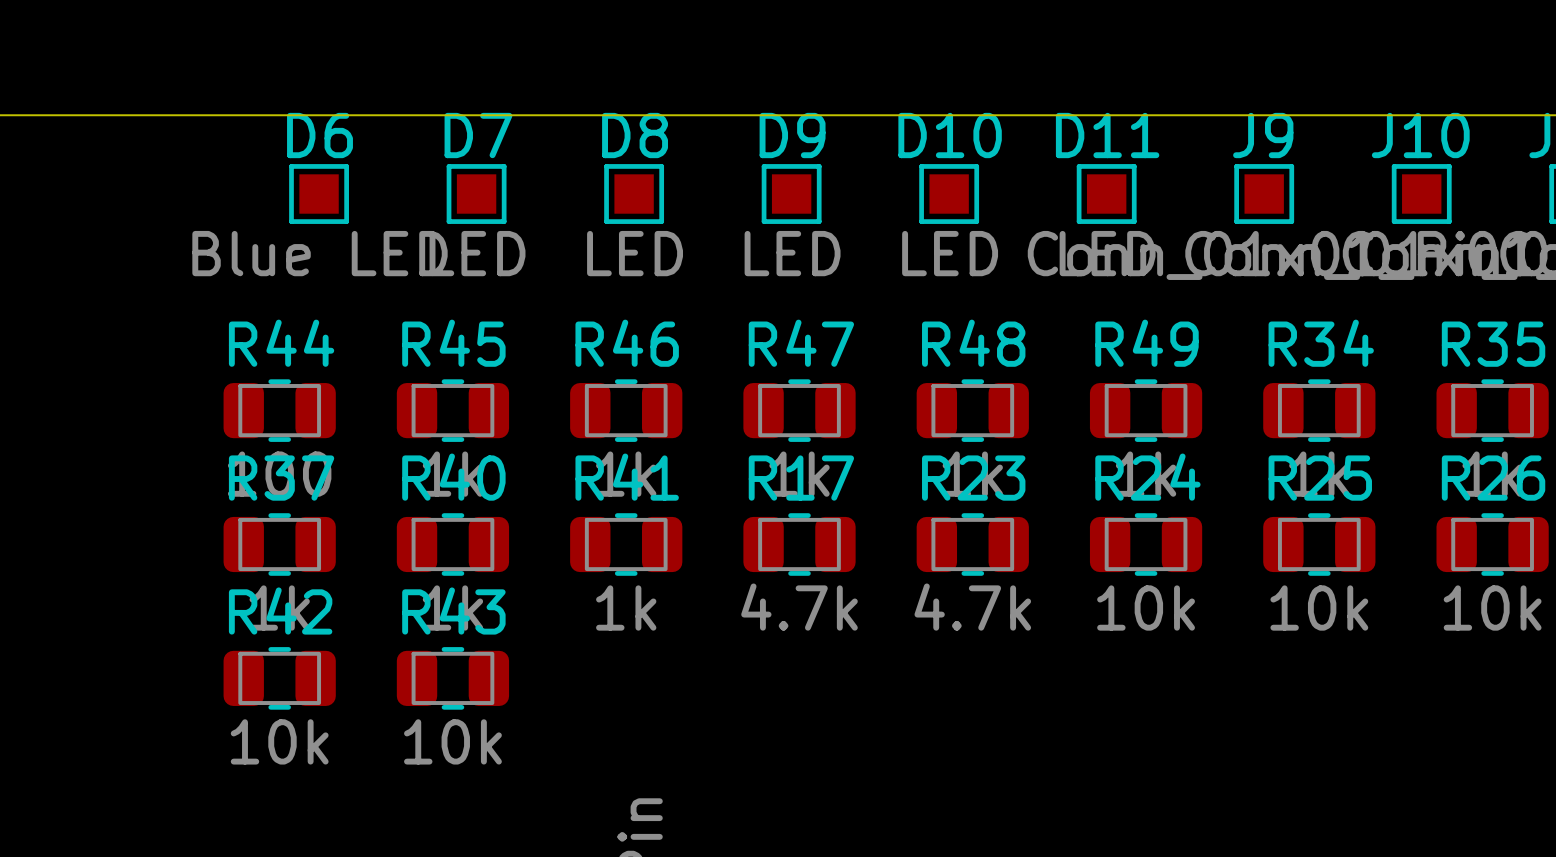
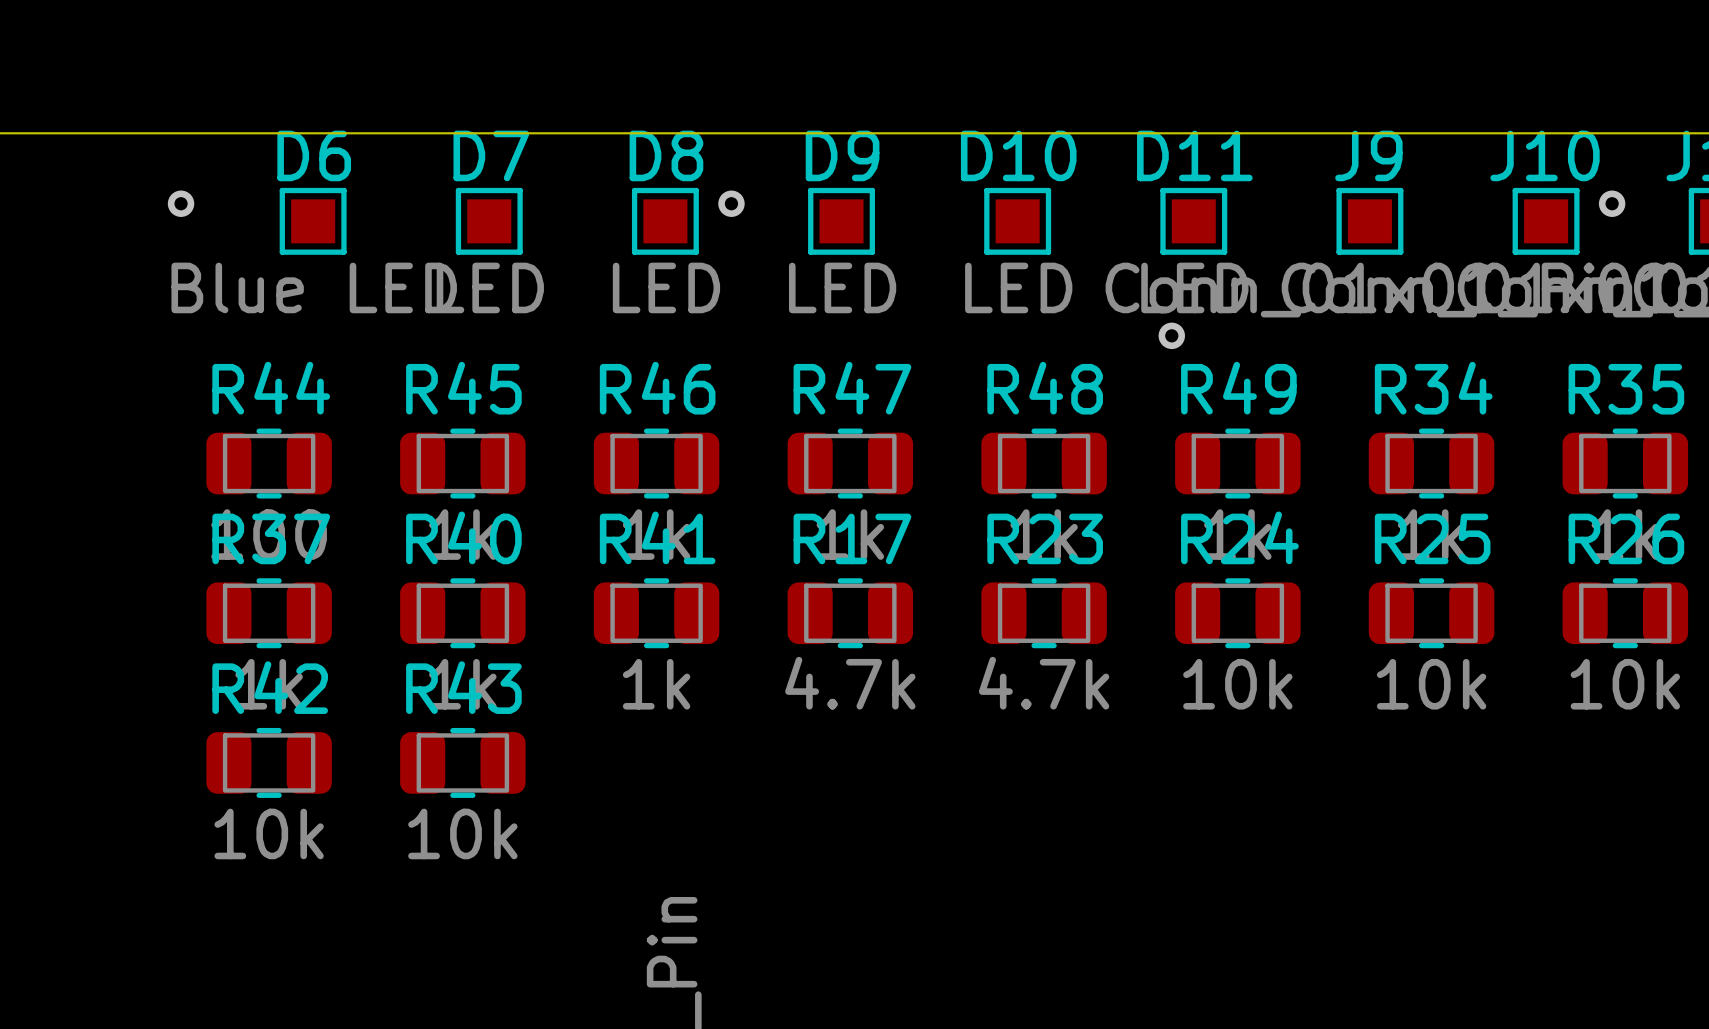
via: none -> (181, 203)
via: none -> (731, 203)
via: none -> (1612, 203)
via: none -> (1171, 335)

